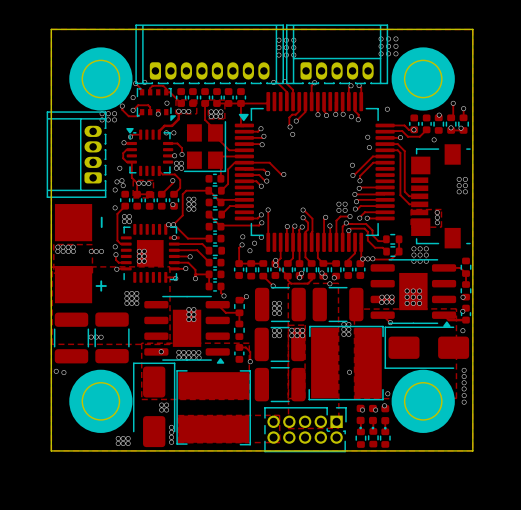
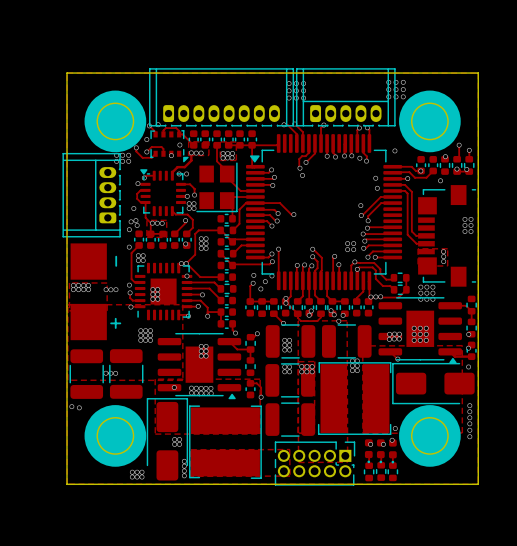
track: (350, 216) (340, 216) (336, 220) (336, 242) -> none
via: (350, 216) -> none
via: (349, 372) -> none

